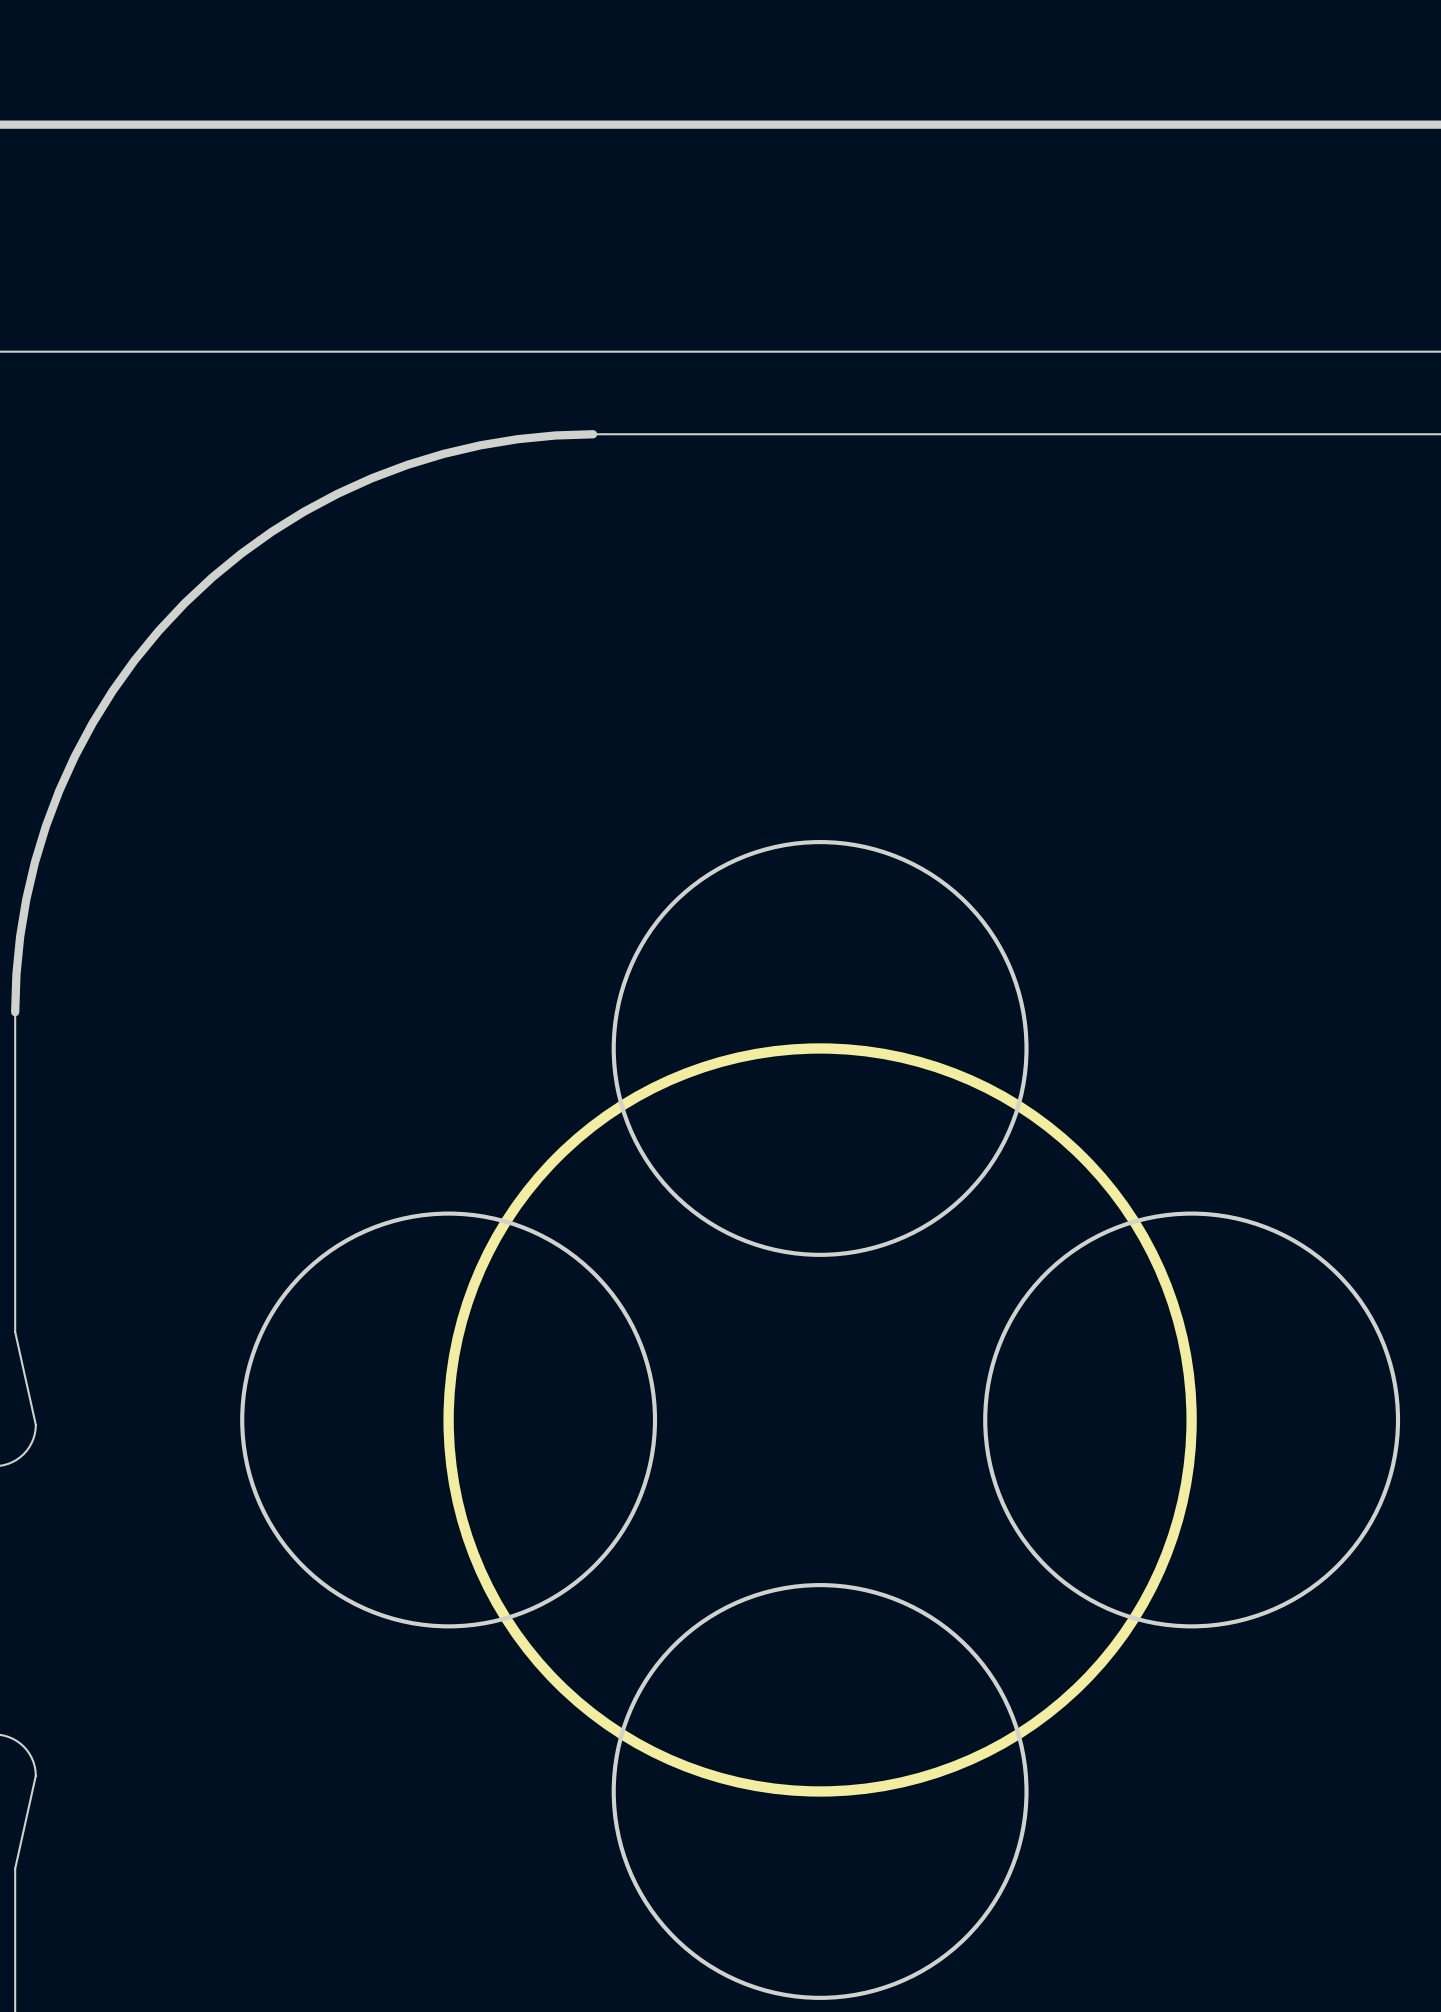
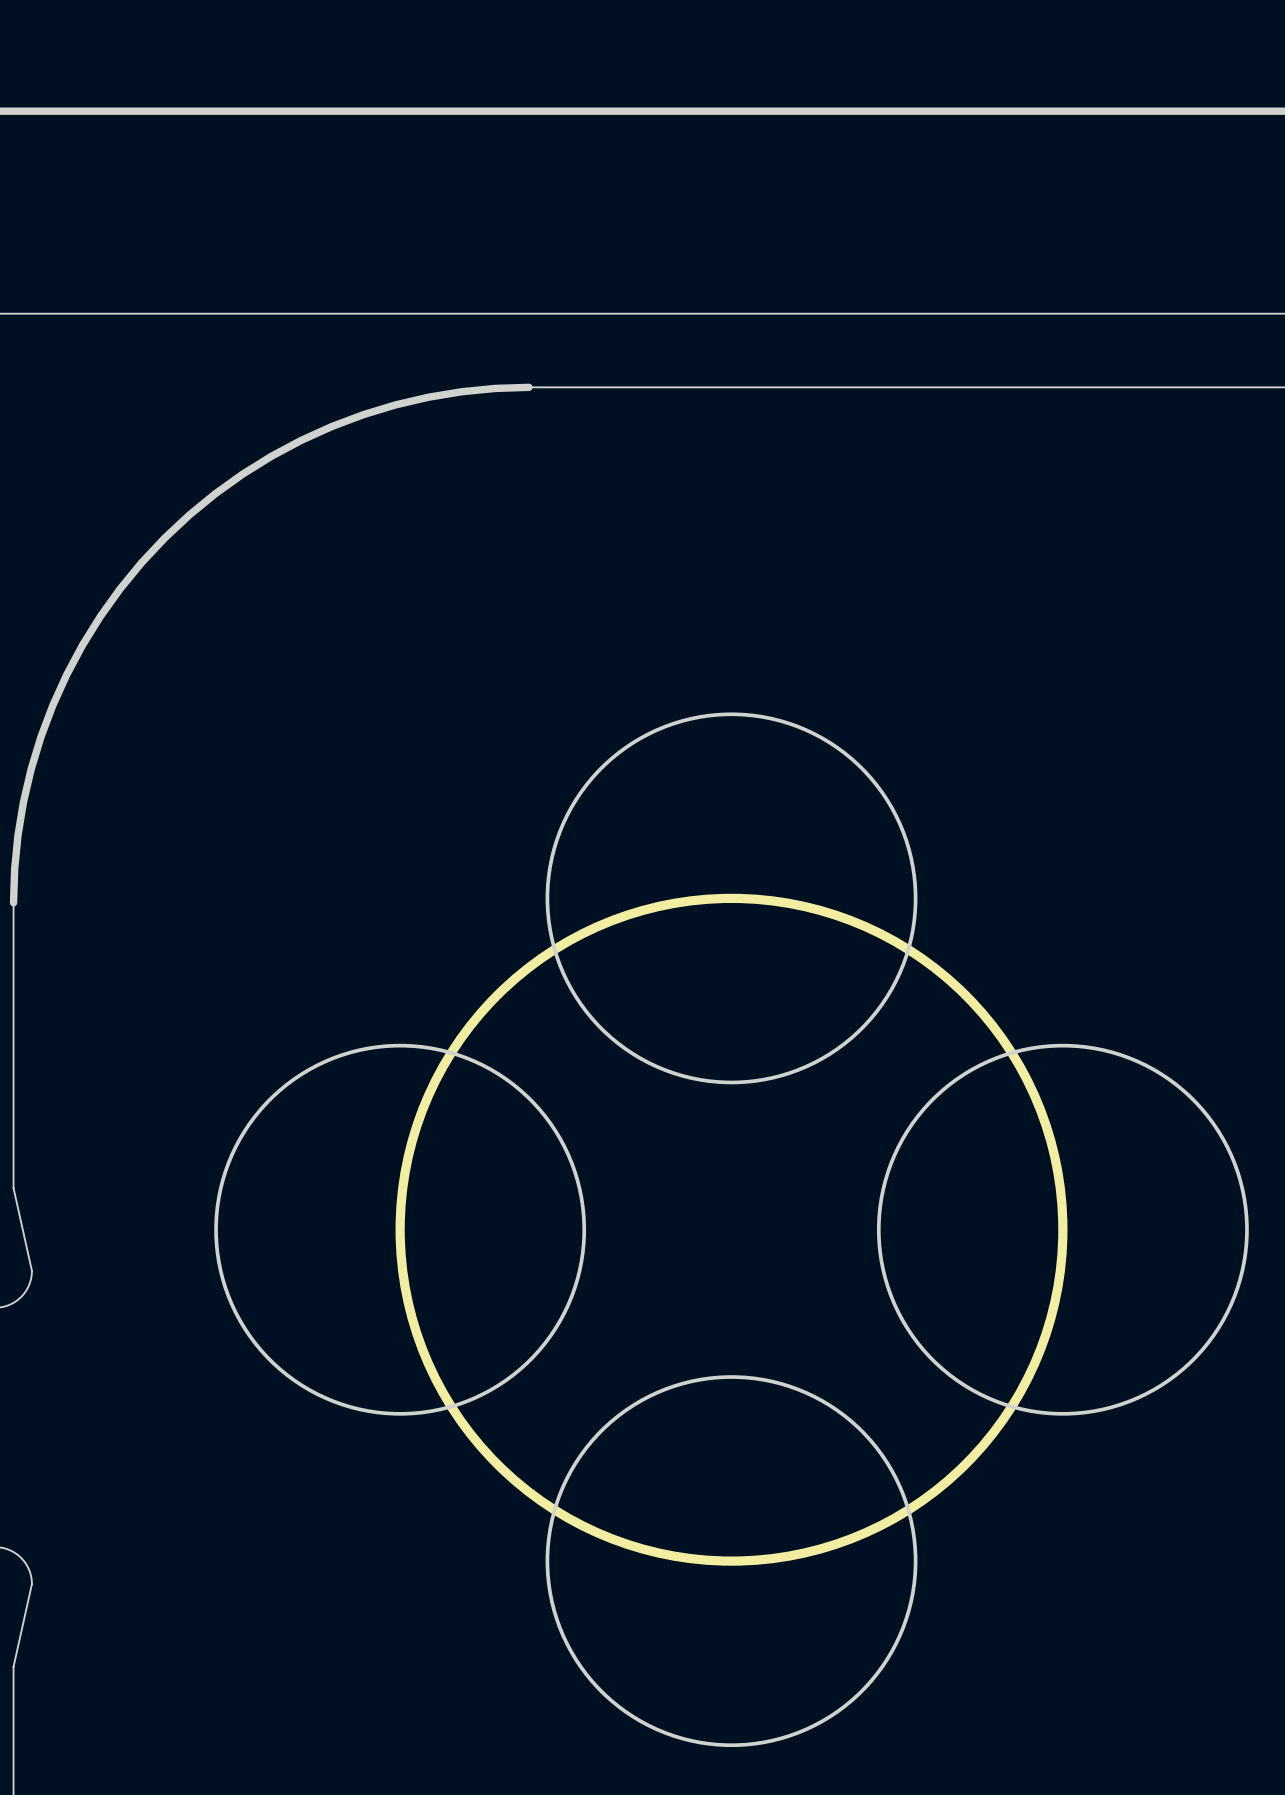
round board edge position: (820, 1048) -> (731, 898)
round board edge position: (448, 1419) -> (400, 1229)
drawing position: (820, 1419) -> (731, 1229)
round board edge position: (1191, 1419) -> (1062, 1229)
round board edge position: (820, 1791) -> (731, 1561)

